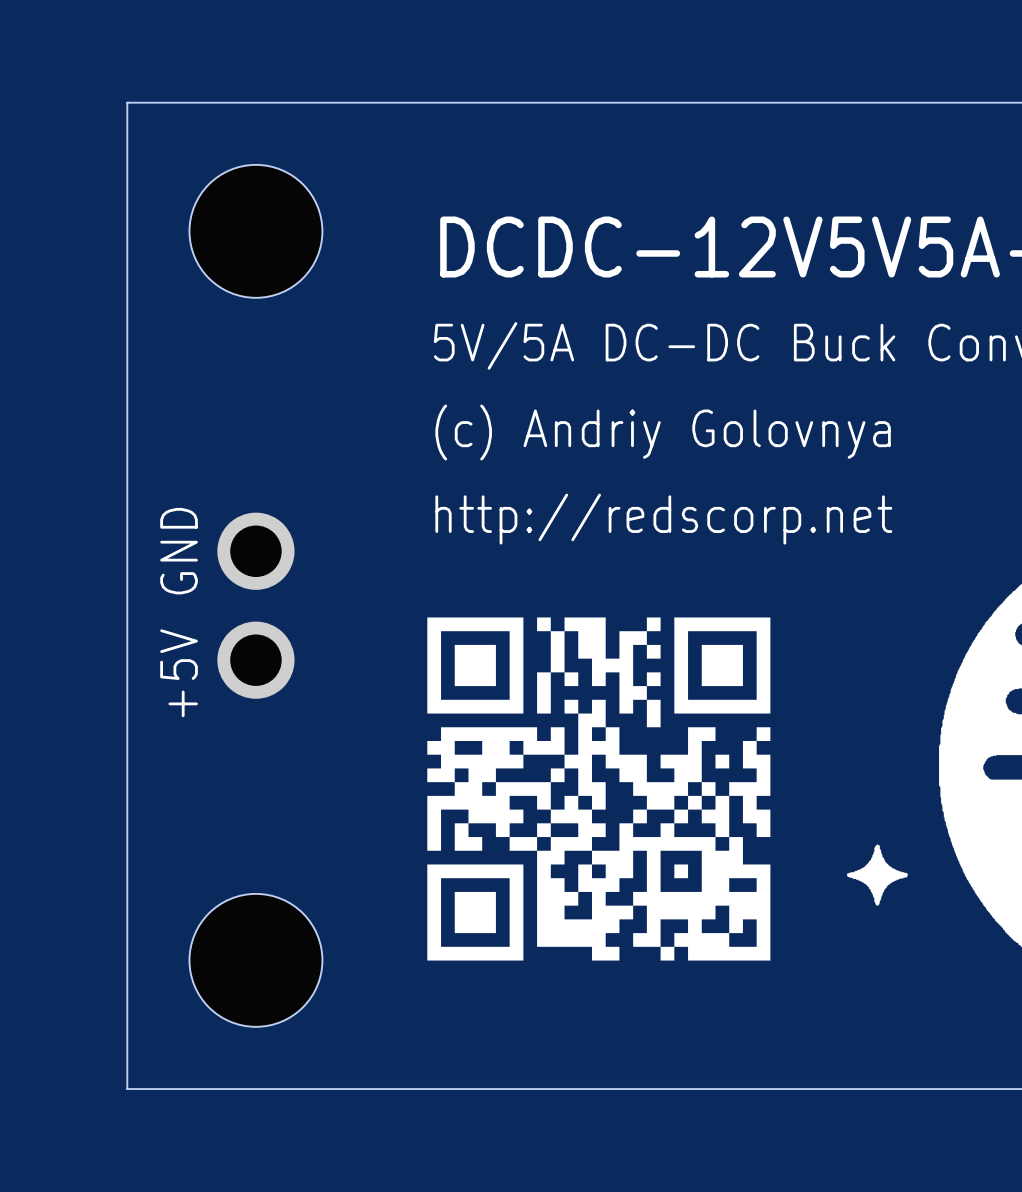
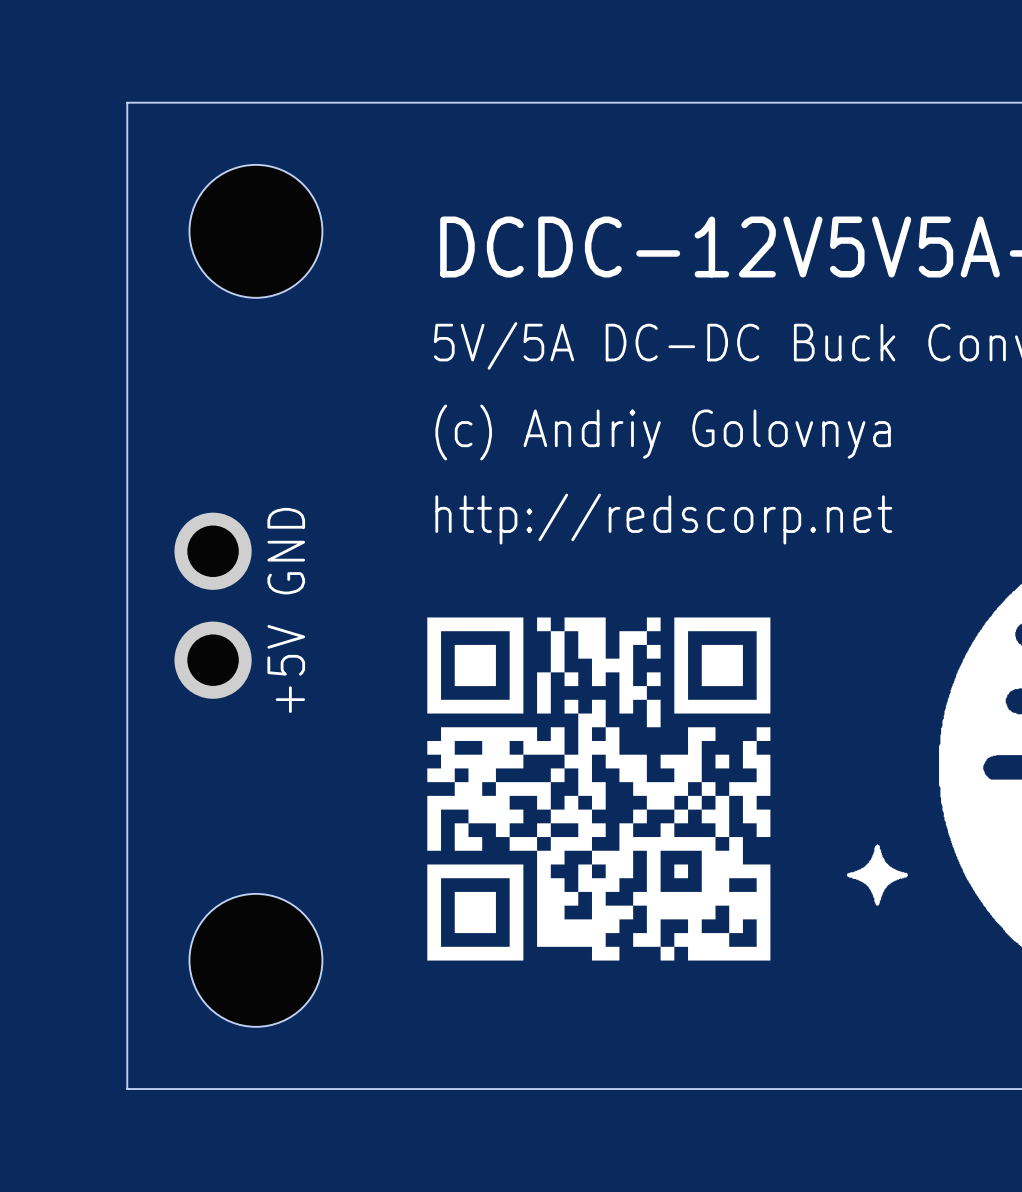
text position: GND (179, 551) -> GND (286, 551)
part position: (255, 605) -> (213, 605)
text position: +5V (179, 673) -> +5V (286, 668)

